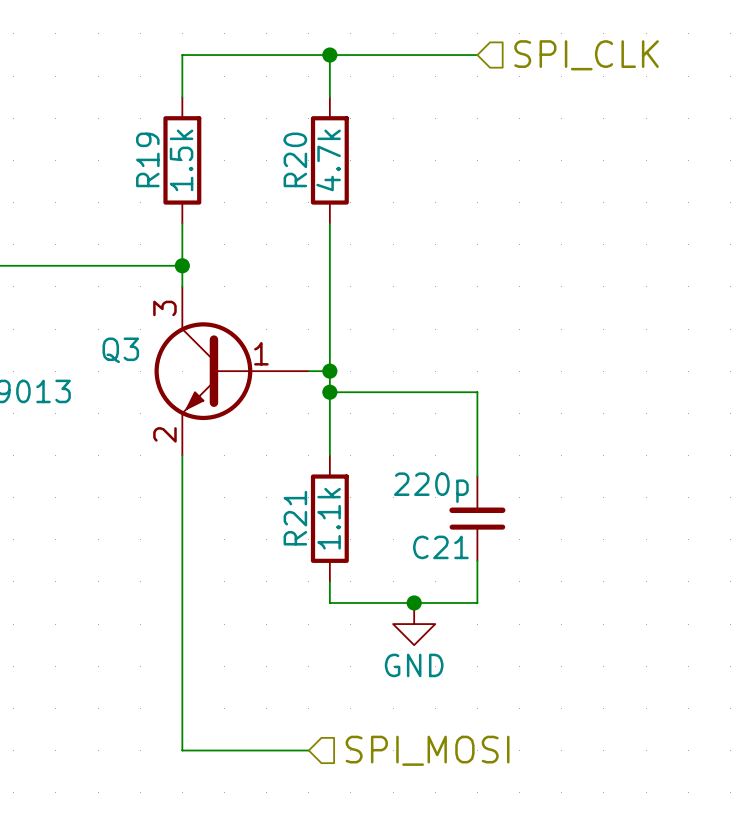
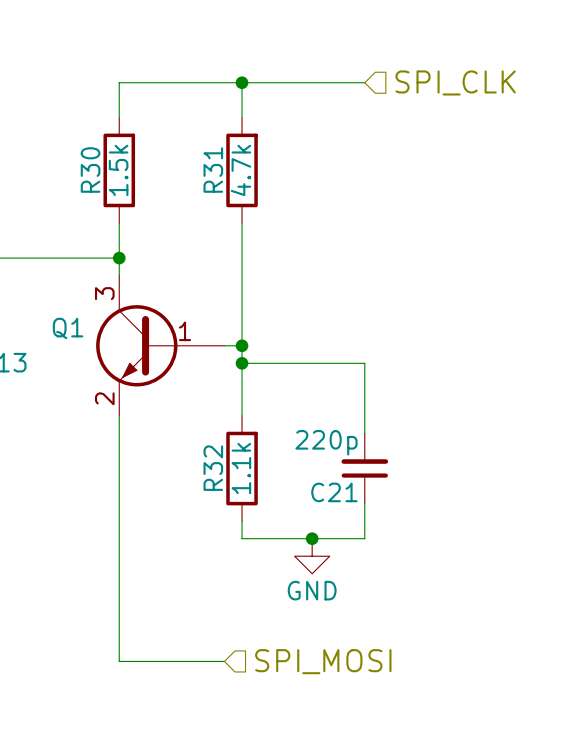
R19 name: R19 (147, 159) -> R30 (90, 170)
R20 name: R20 (295, 159) -> R31 (213, 170)
Q3 name: Q3 (120, 350) -> Q1 (68, 328)
R21 name: R21 (295, 518) -> R32 (213, 468)

